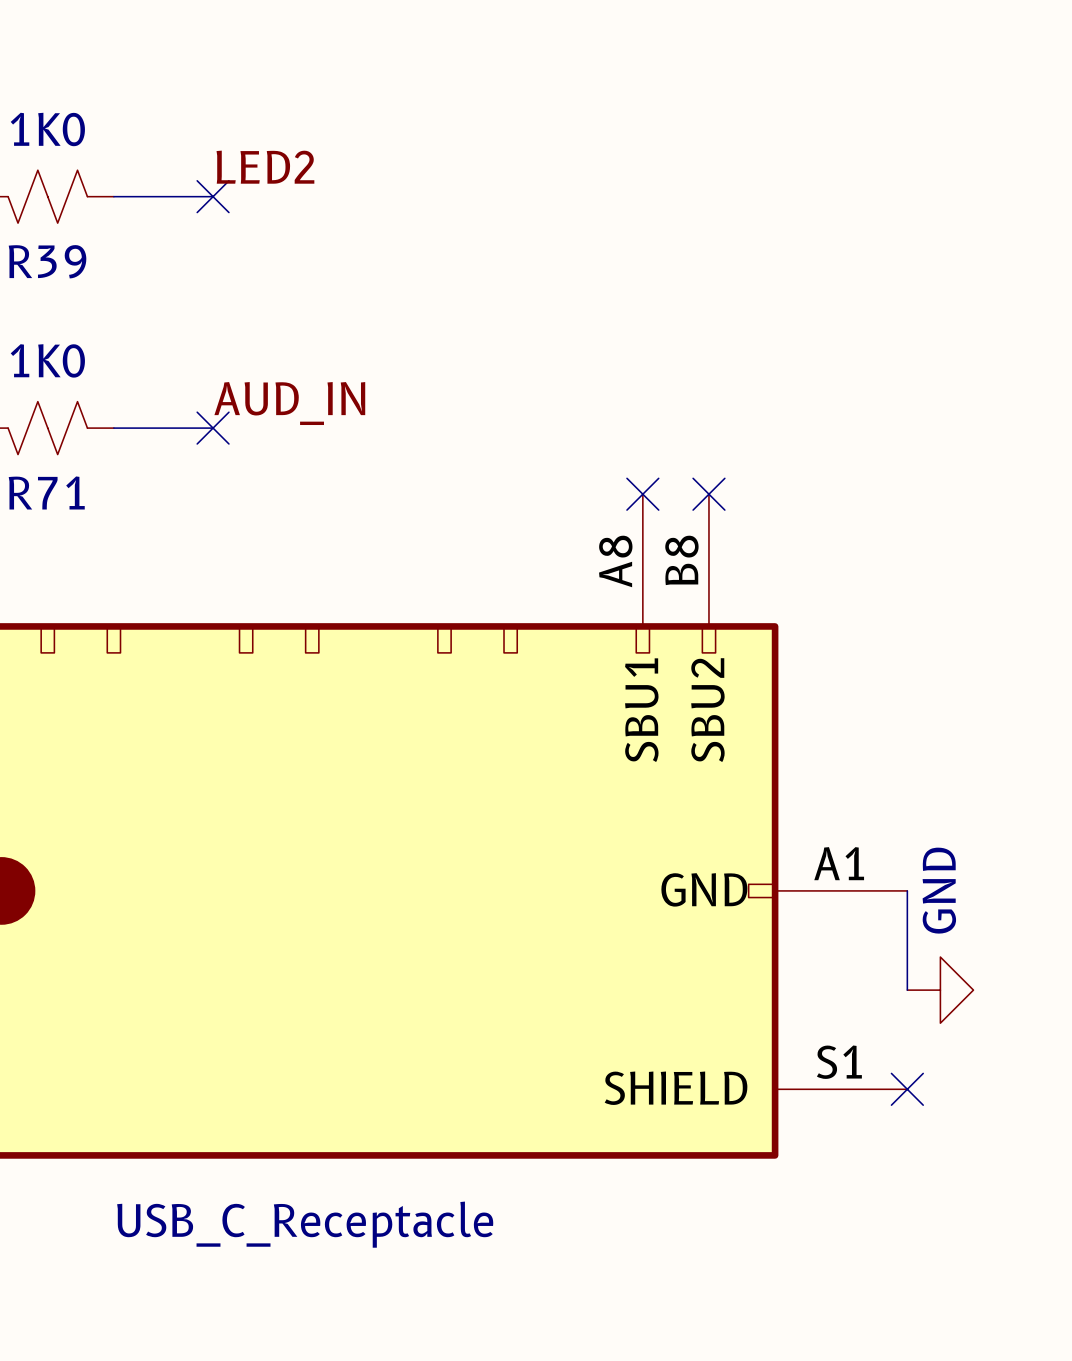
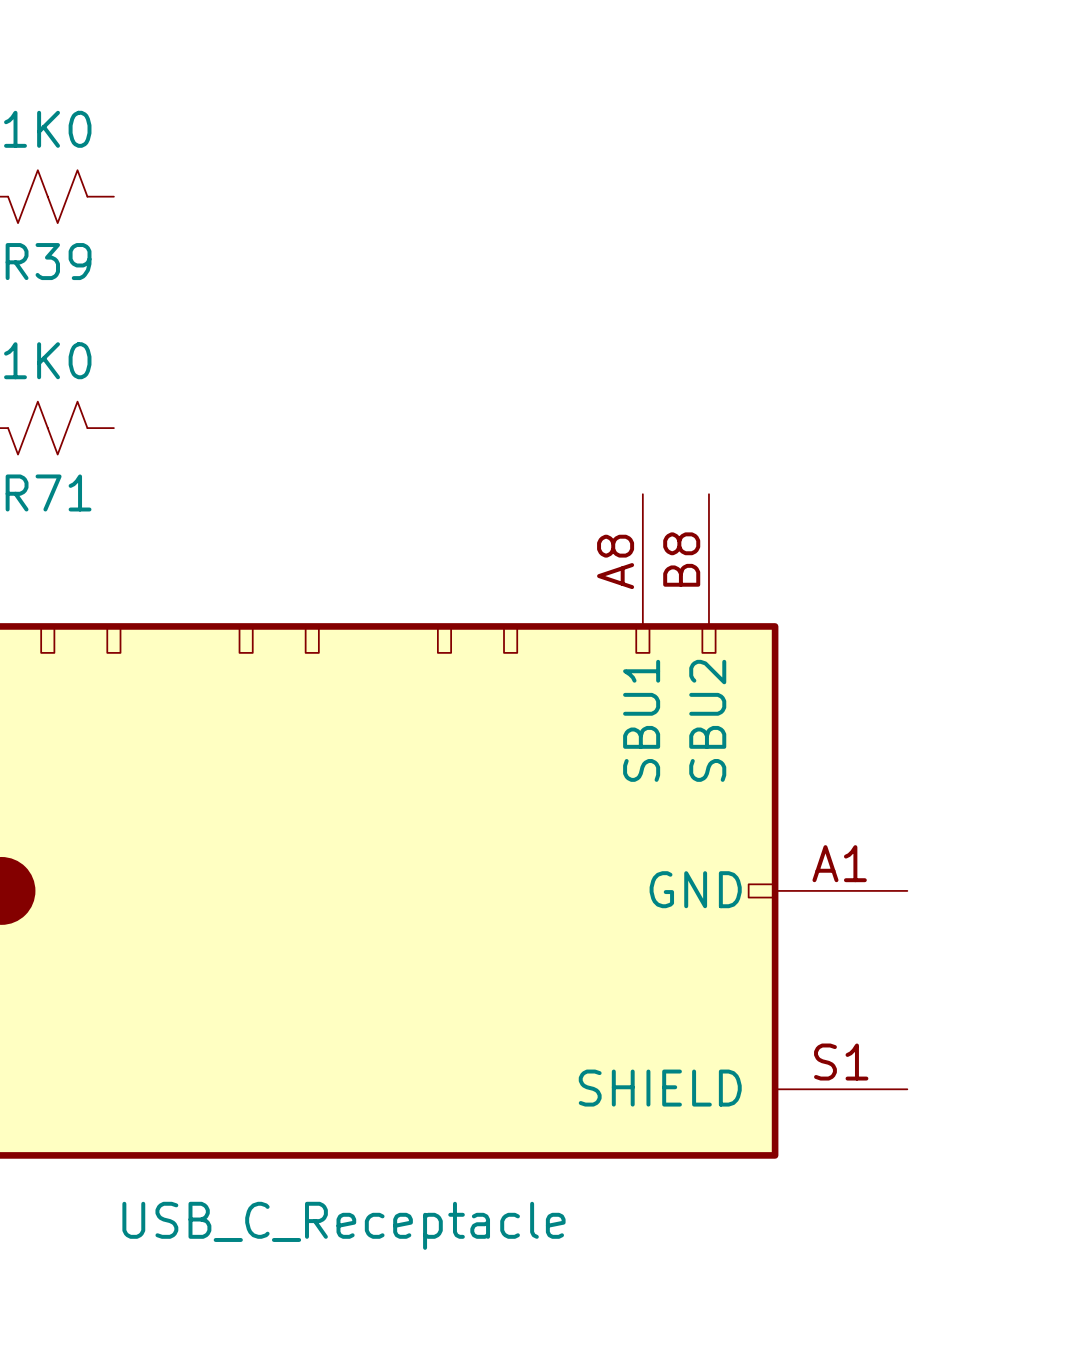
label: LED2 (265, 167) -> none
wire: (113, 196) (213, 196) -> none
no-connect mark: (213, 196) -> none
label: AUD_IN (289, 403) -> none
wire: (113, 428) (213, 428) -> none
no-connect mark: (213, 428) -> none
no-connect mark: (642, 494) -> none
no-connect mark: (708, 494) -> none
wire: (907, 890) (907, 990) -> none
power symbol: GND (940, 990) -> none
no-connect mark: (907, 1089) -> none

